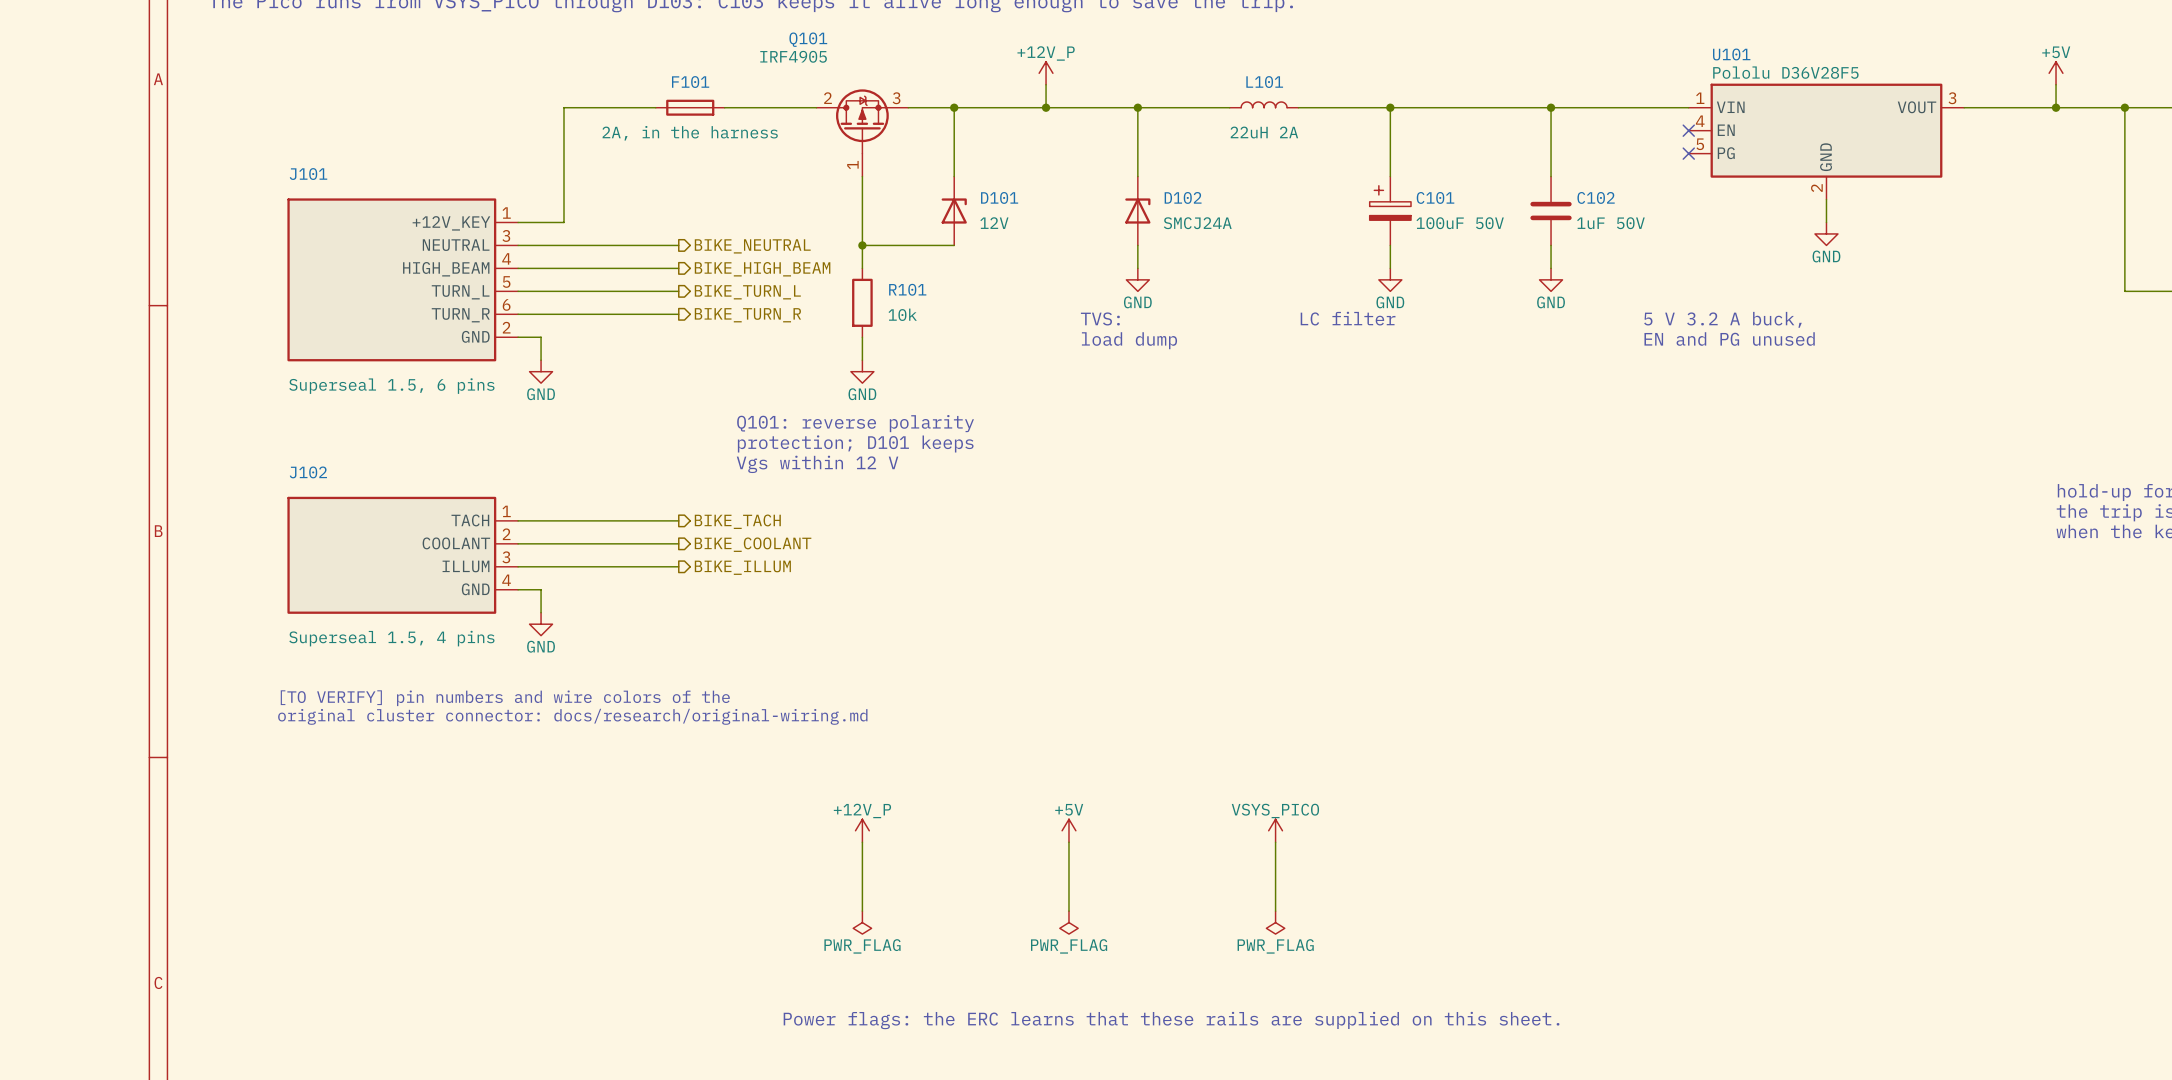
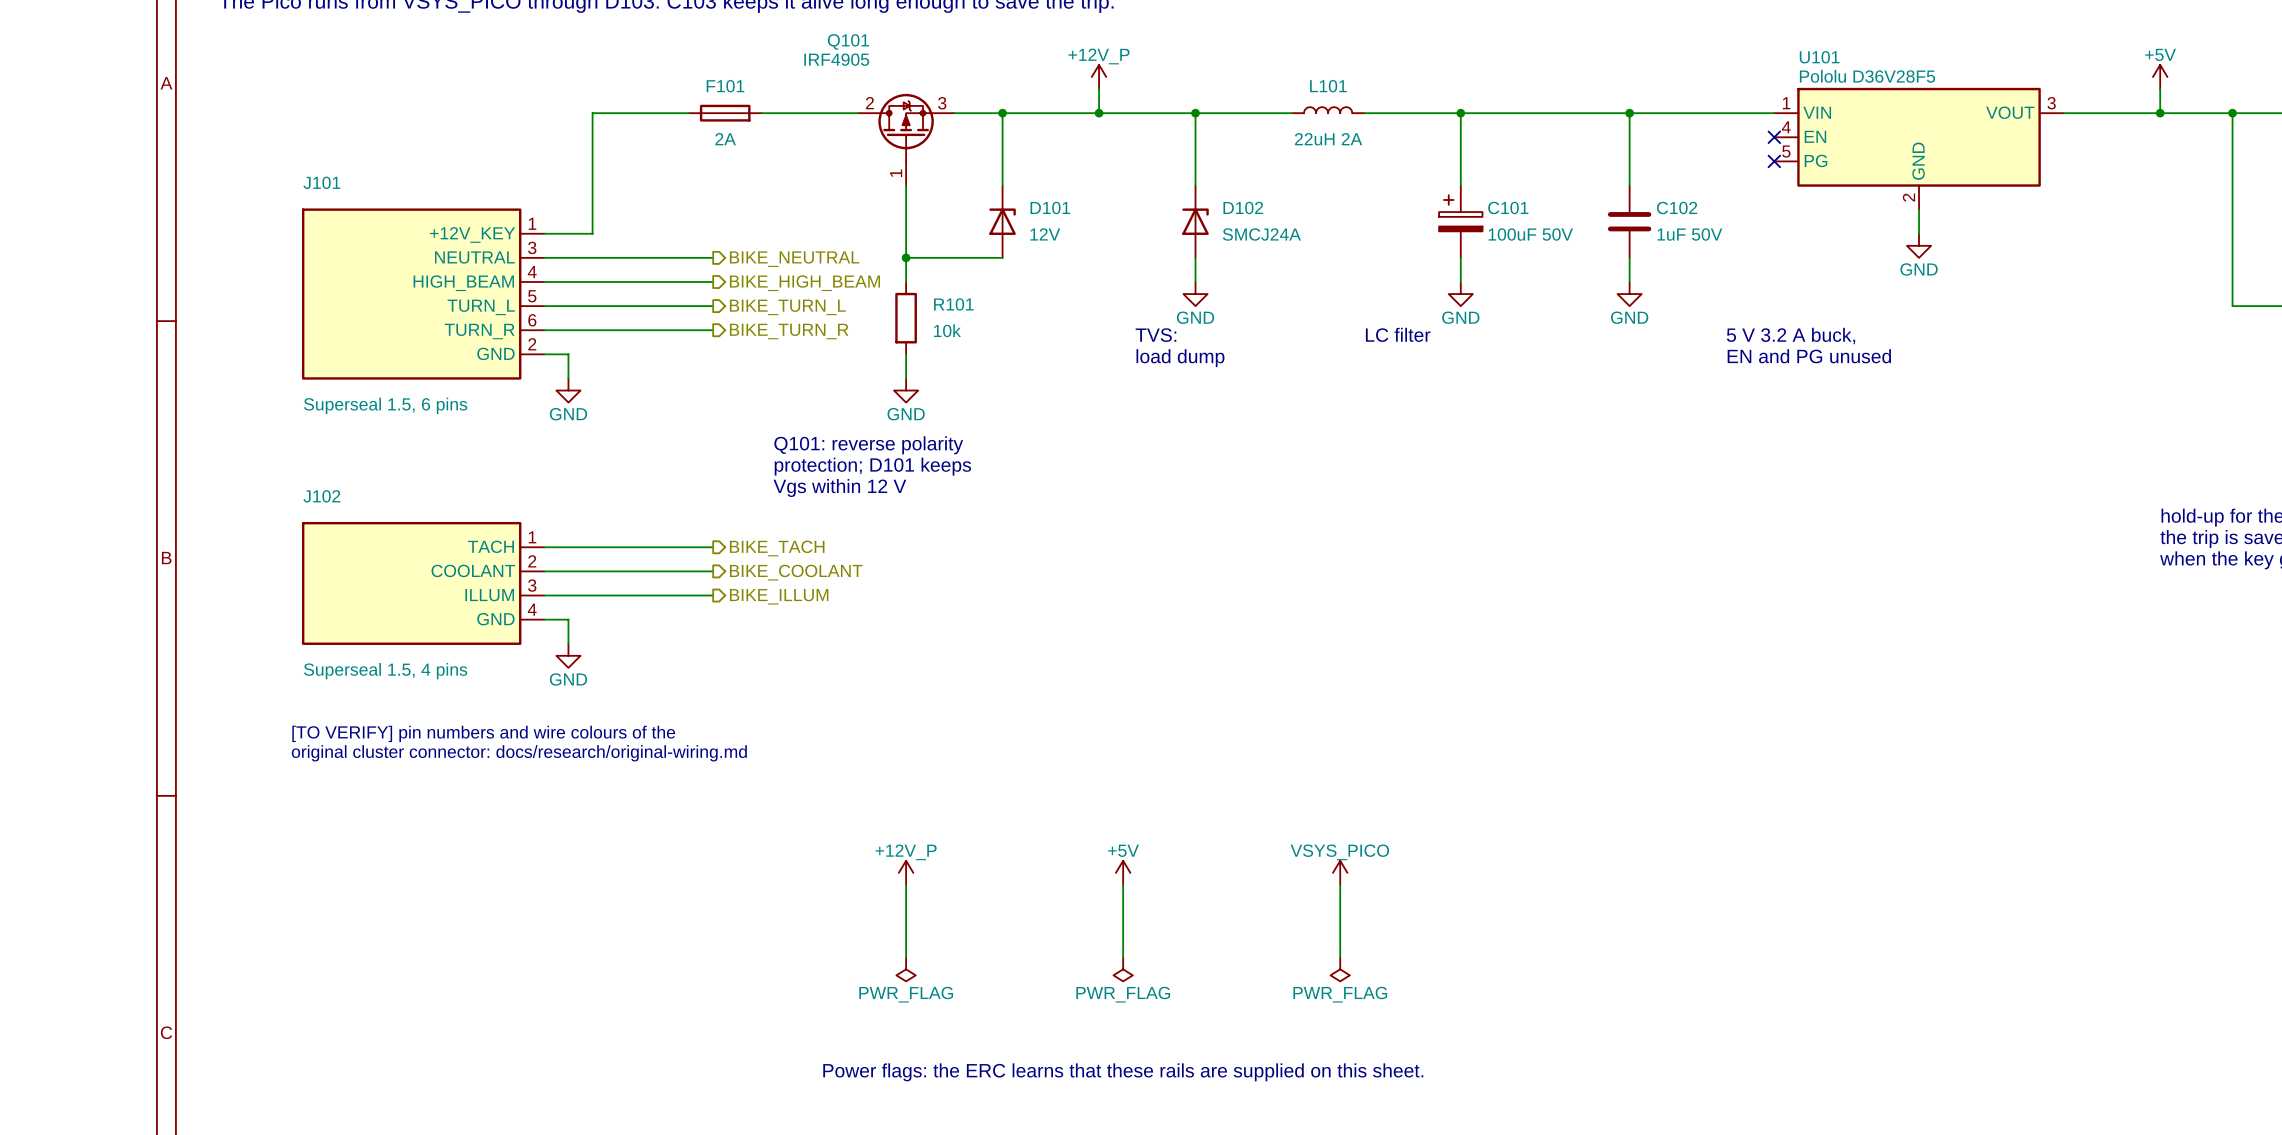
F101 value: 2A, in the harness (690, 133) -> 2A (725, 139)
text: [TO VERIFY] pin numbers and wire colors of the (505, 698) -> [TO VERIFY] pin numbers and wire colours of the (483, 733)

